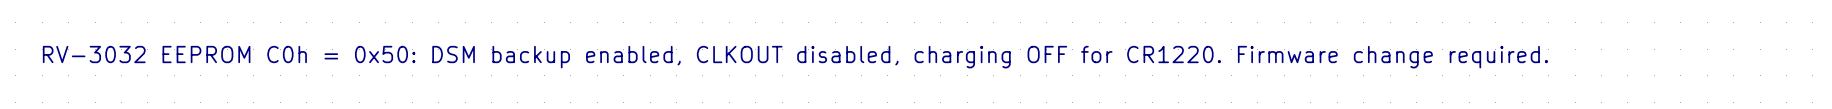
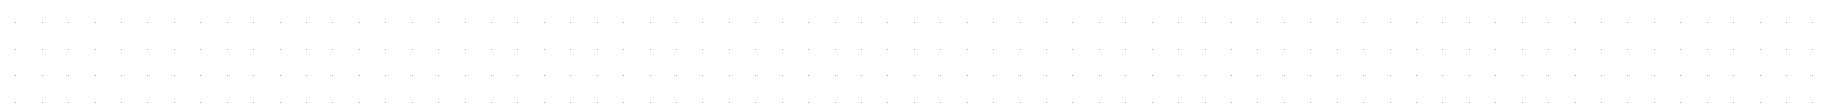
text: RV-3032 EEPROM C0h = 0x50: DSM backup enabled, CLKOUT disabled, charging OFF for CR1220. Firmware change required. (795, 57) -> none

